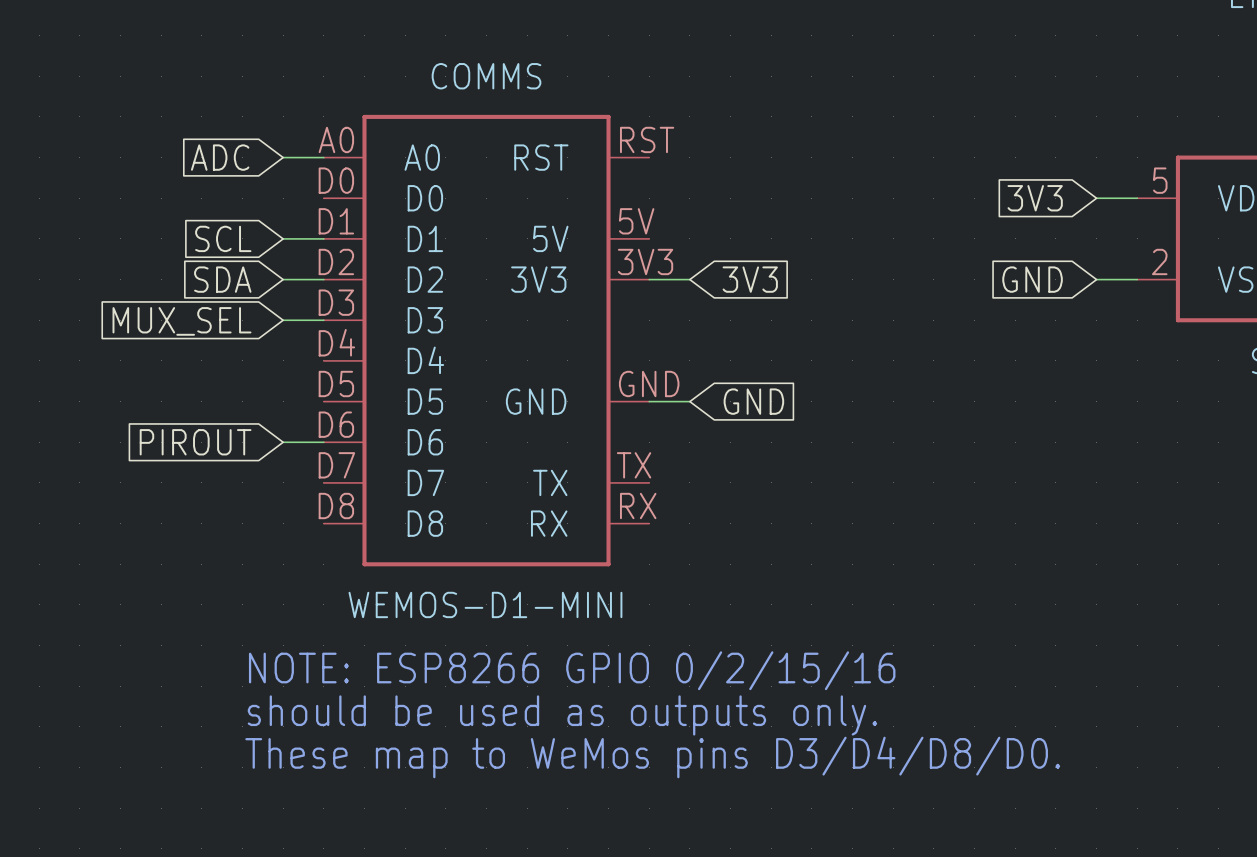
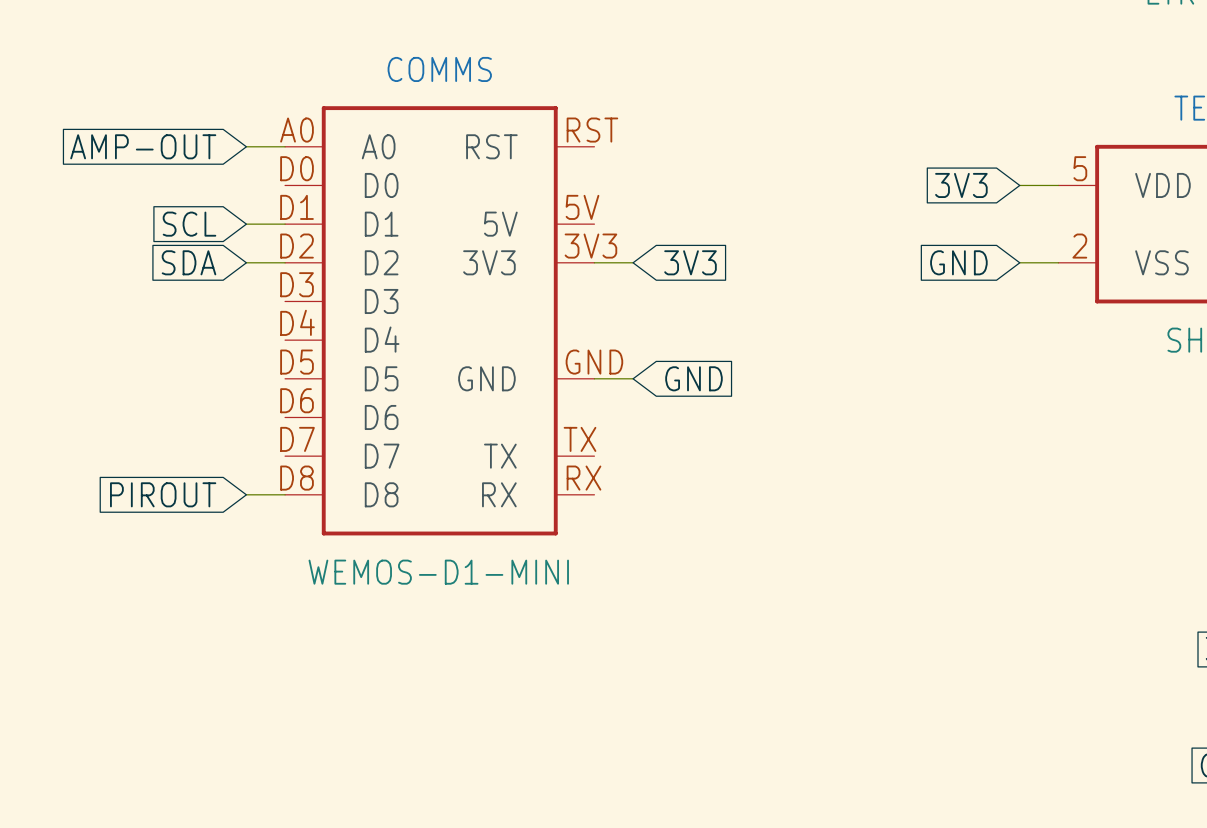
global label: ADC (220, 157) -> AMP-OUT (143, 146)
wire: (283, 320) (323, 320) -> none
global label: MUX_SEL (181, 321) -> none
global label position: PIROUT (195, 442) -> PIROUT (163, 494)
wire: (283, 442) (323, 442) -> (246, 494) (285, 494)
text: NOTE: ESP8266 GPIO 0/2/15/16 (572, 670) -> none
text: should be used as outputs only. (562, 715) -> none
text: These map to WeMos pins D3/D4/D8/D0. (652, 757) -> none

